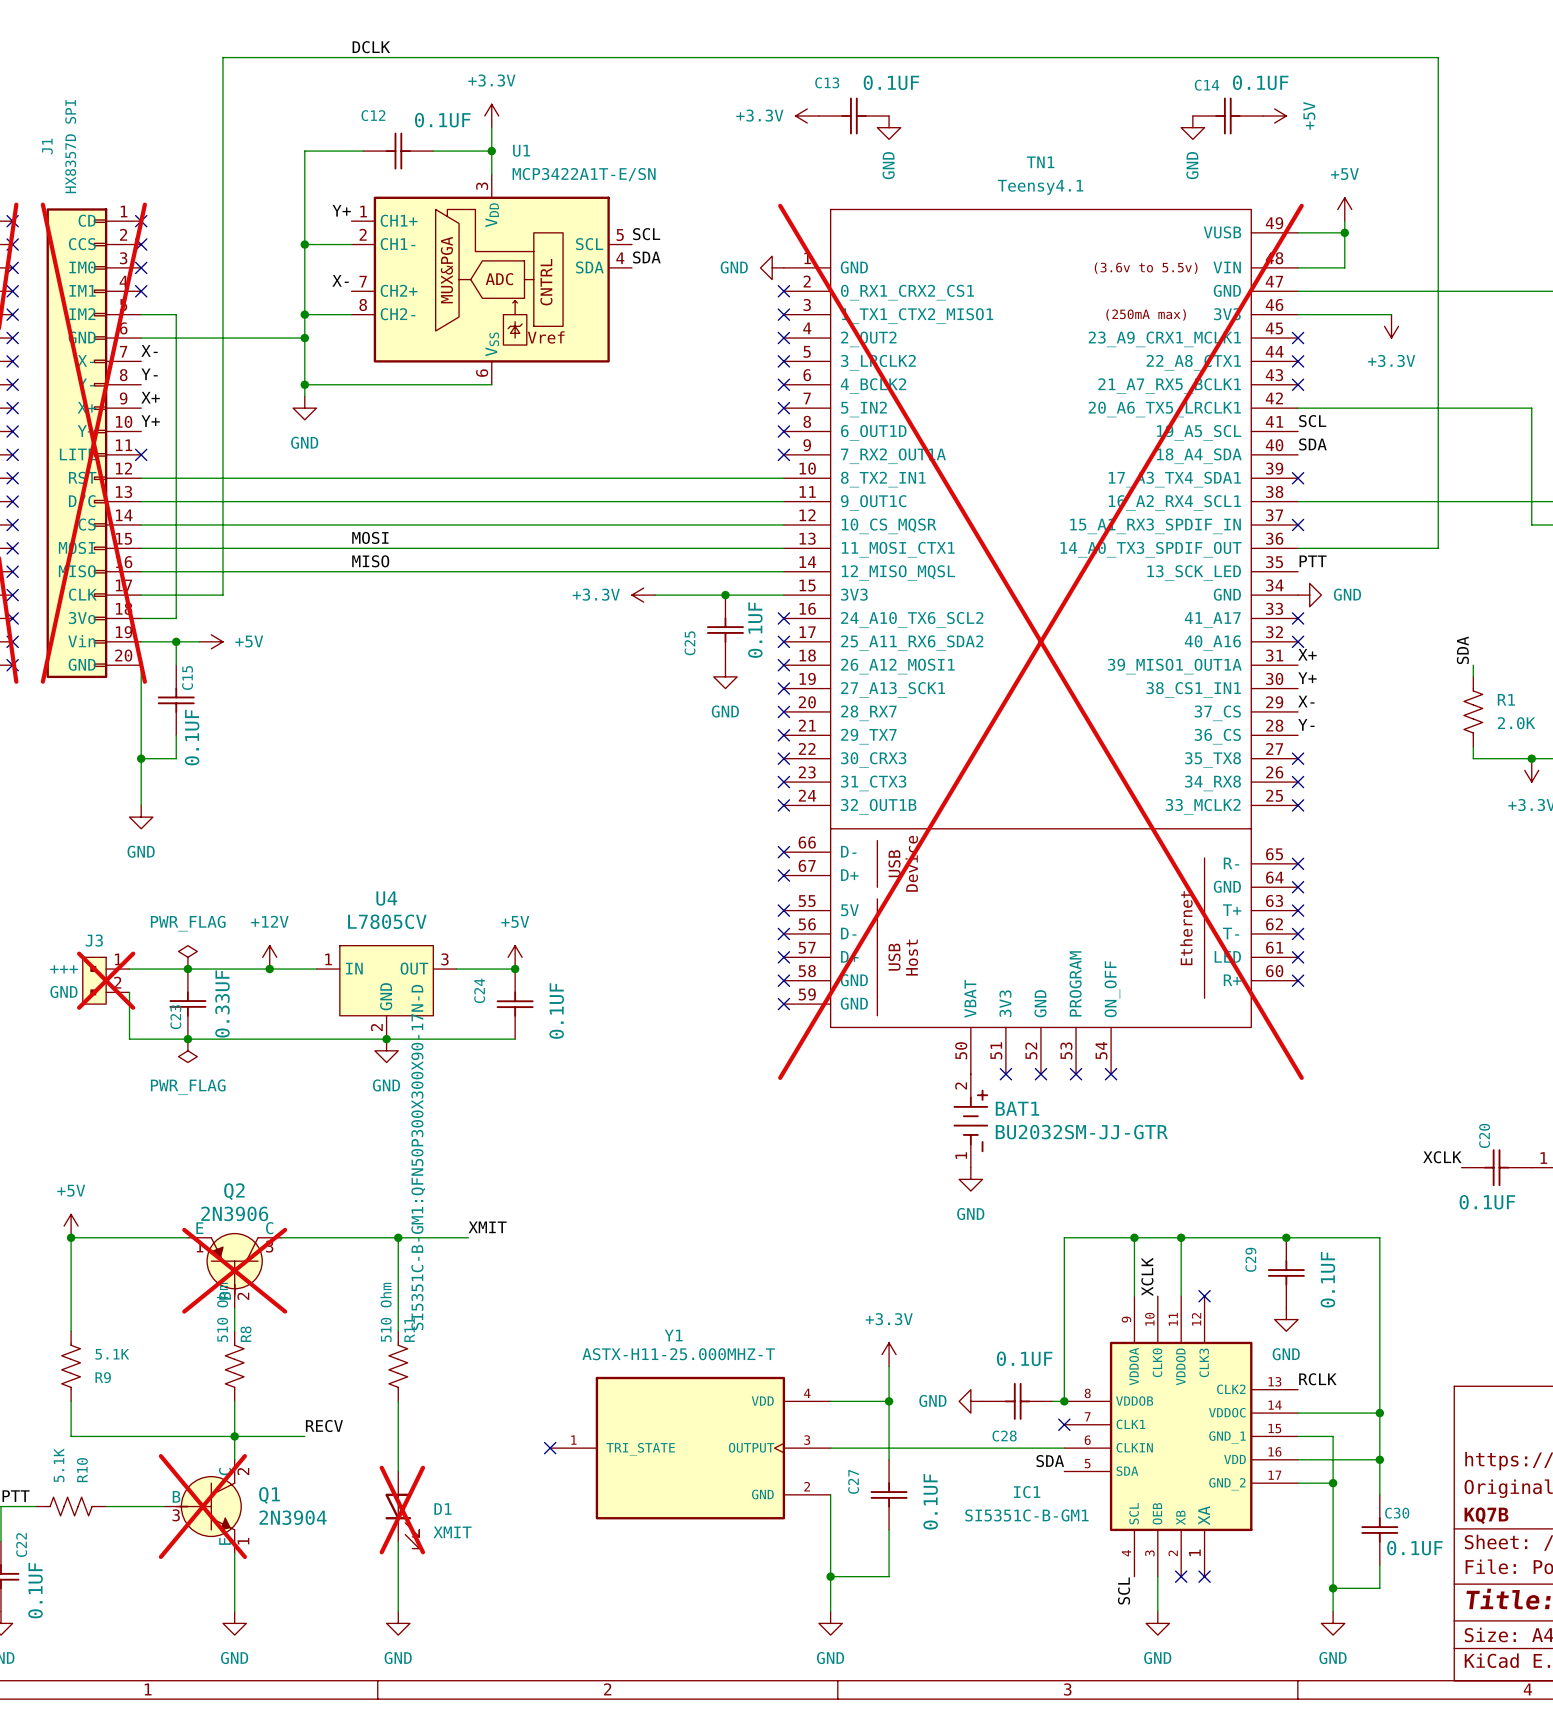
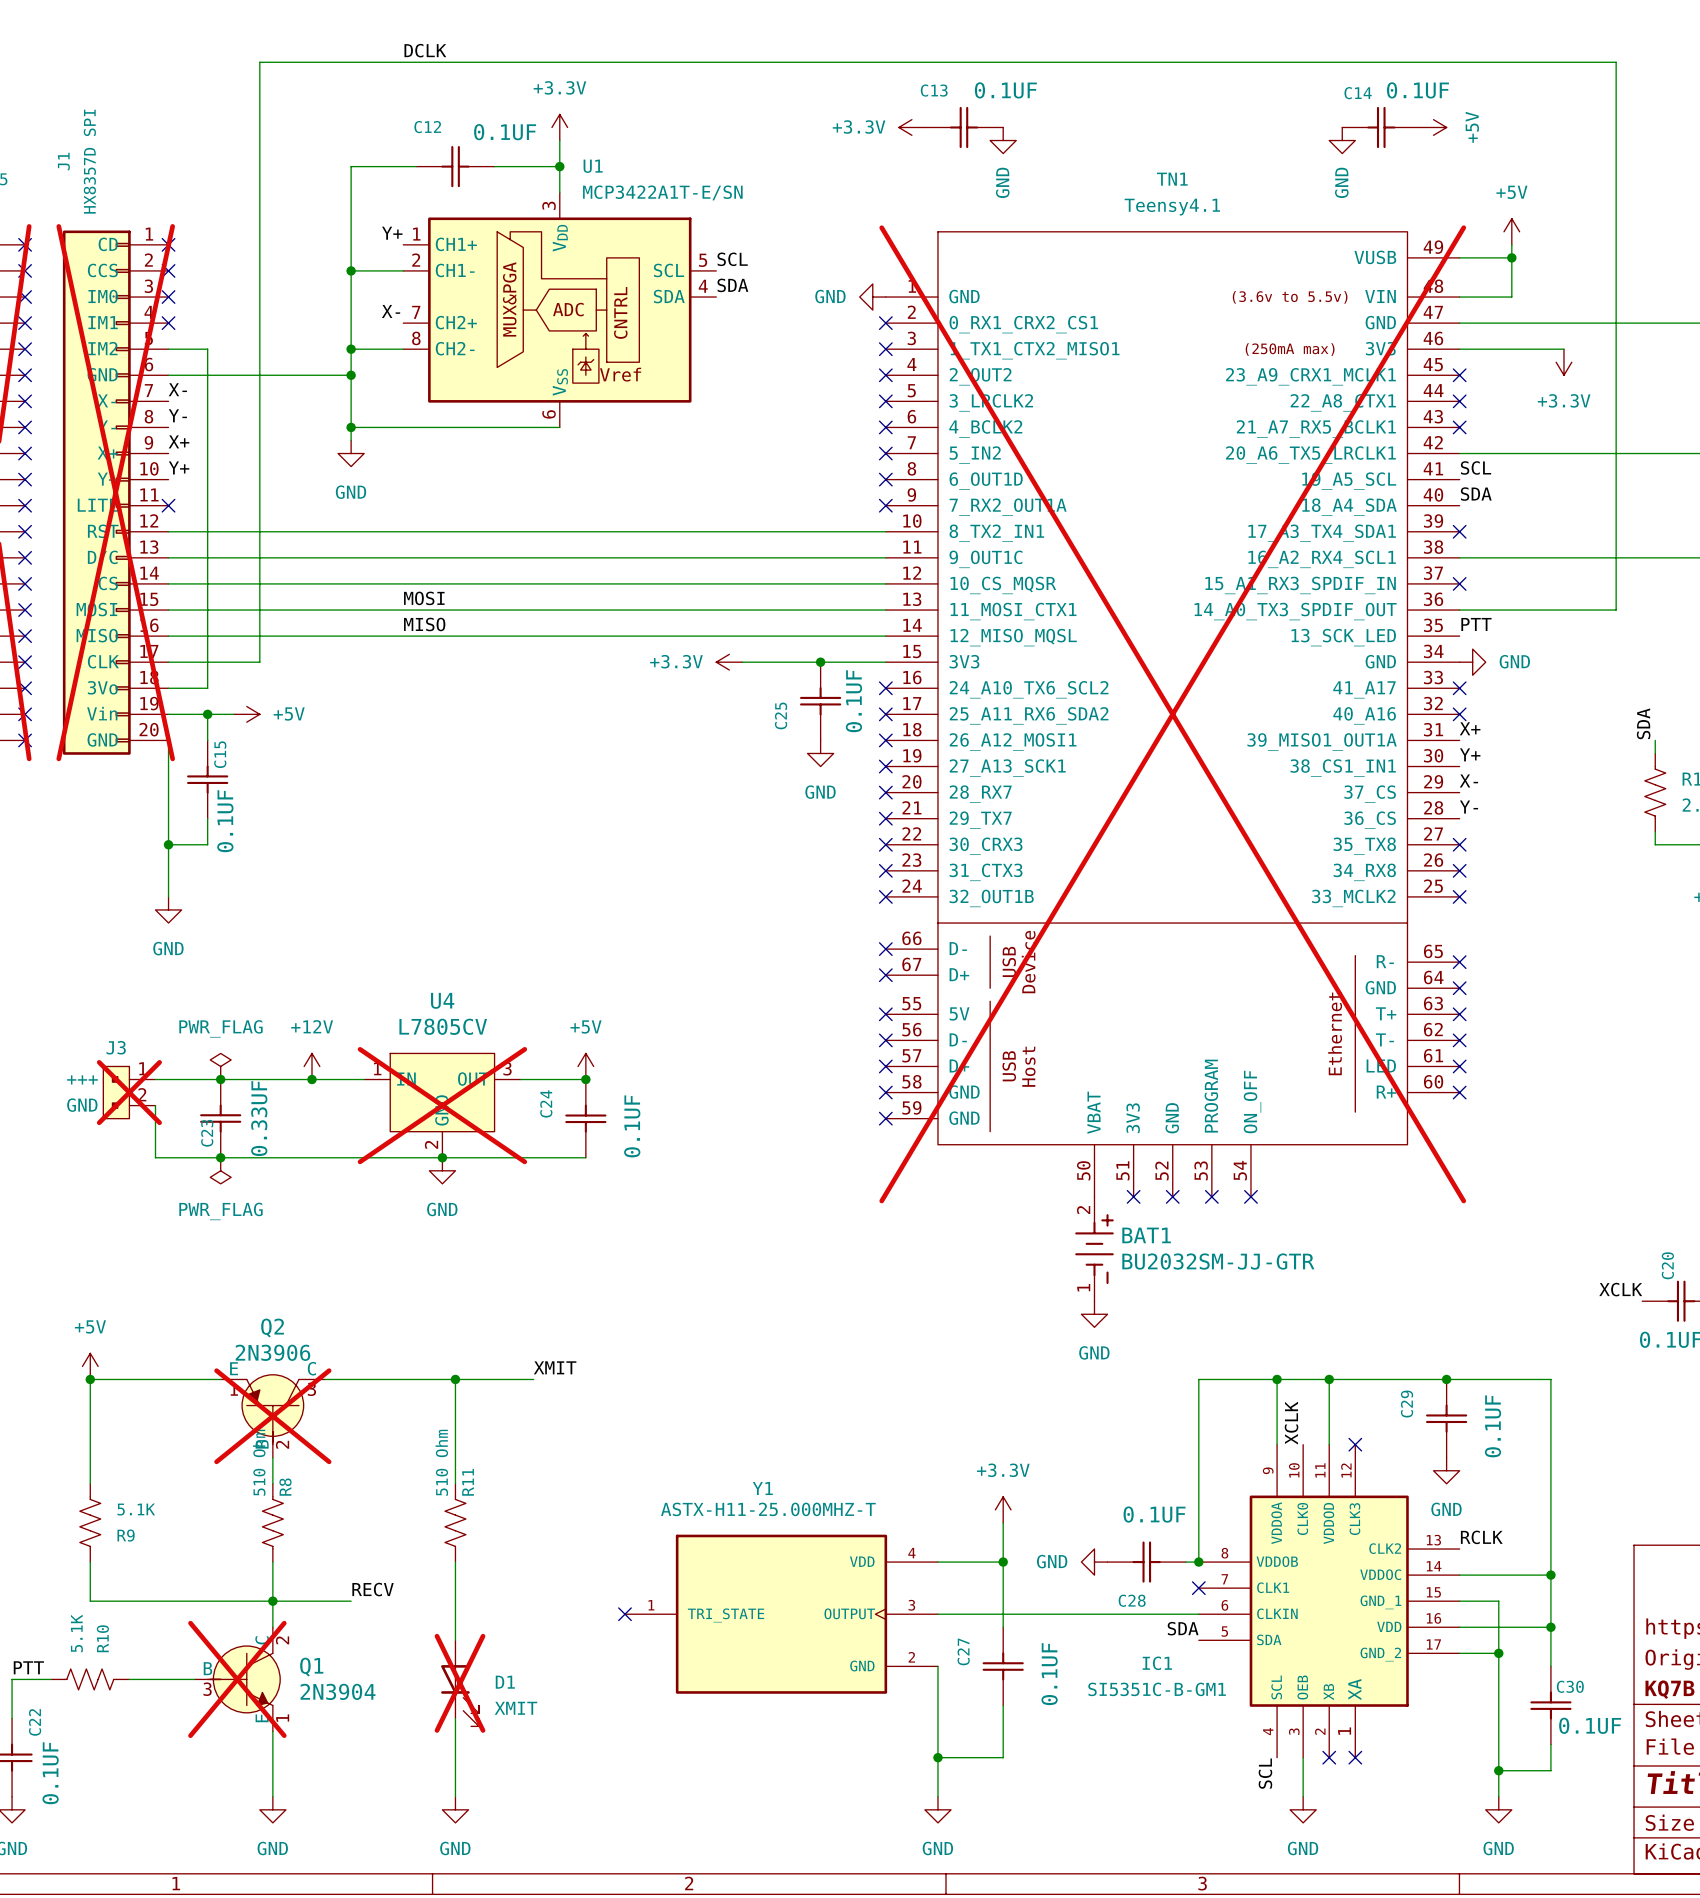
U4 do-not-place cross: none -> (442, 1105)
IC1 text: SI5351C-B-GM1:QFN50P300X300X90-17N-D (418, 1157) -> none

